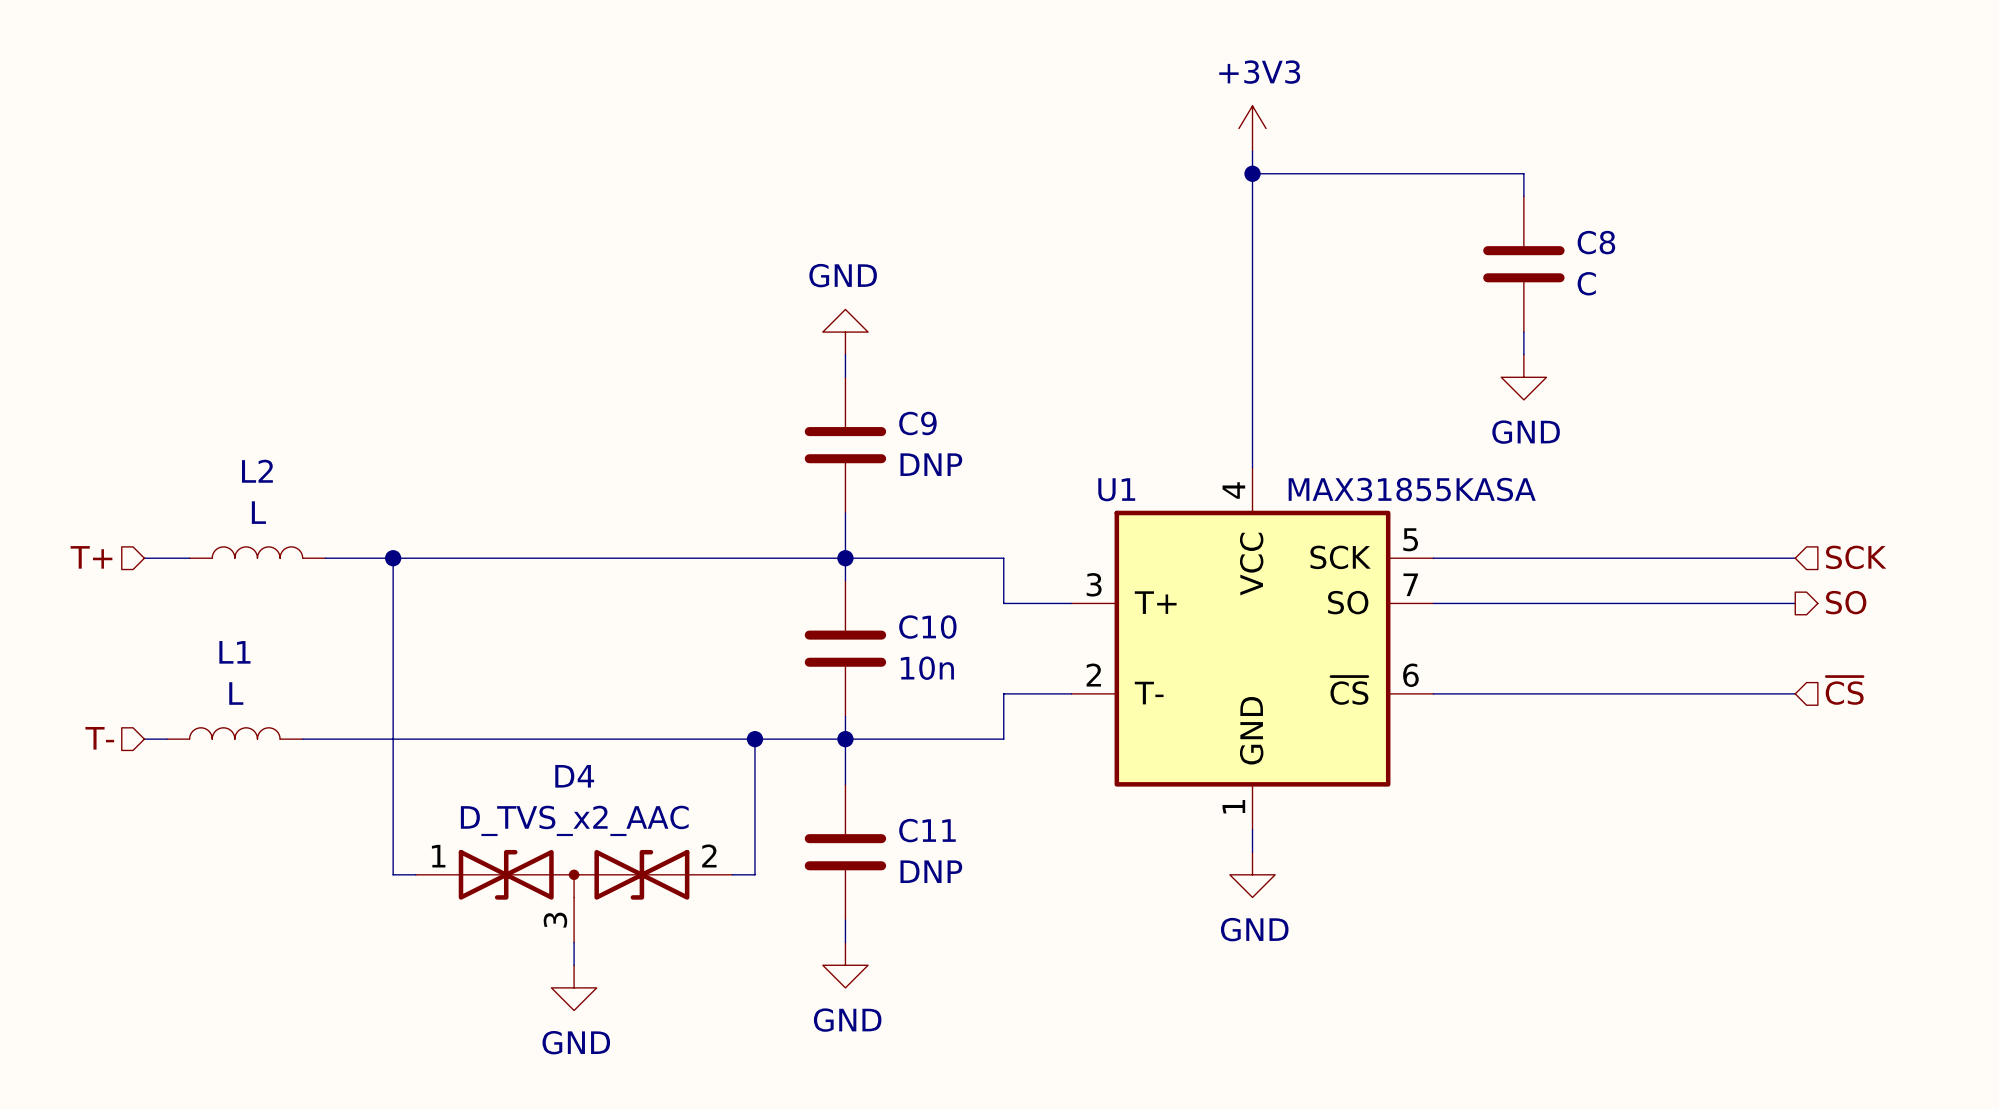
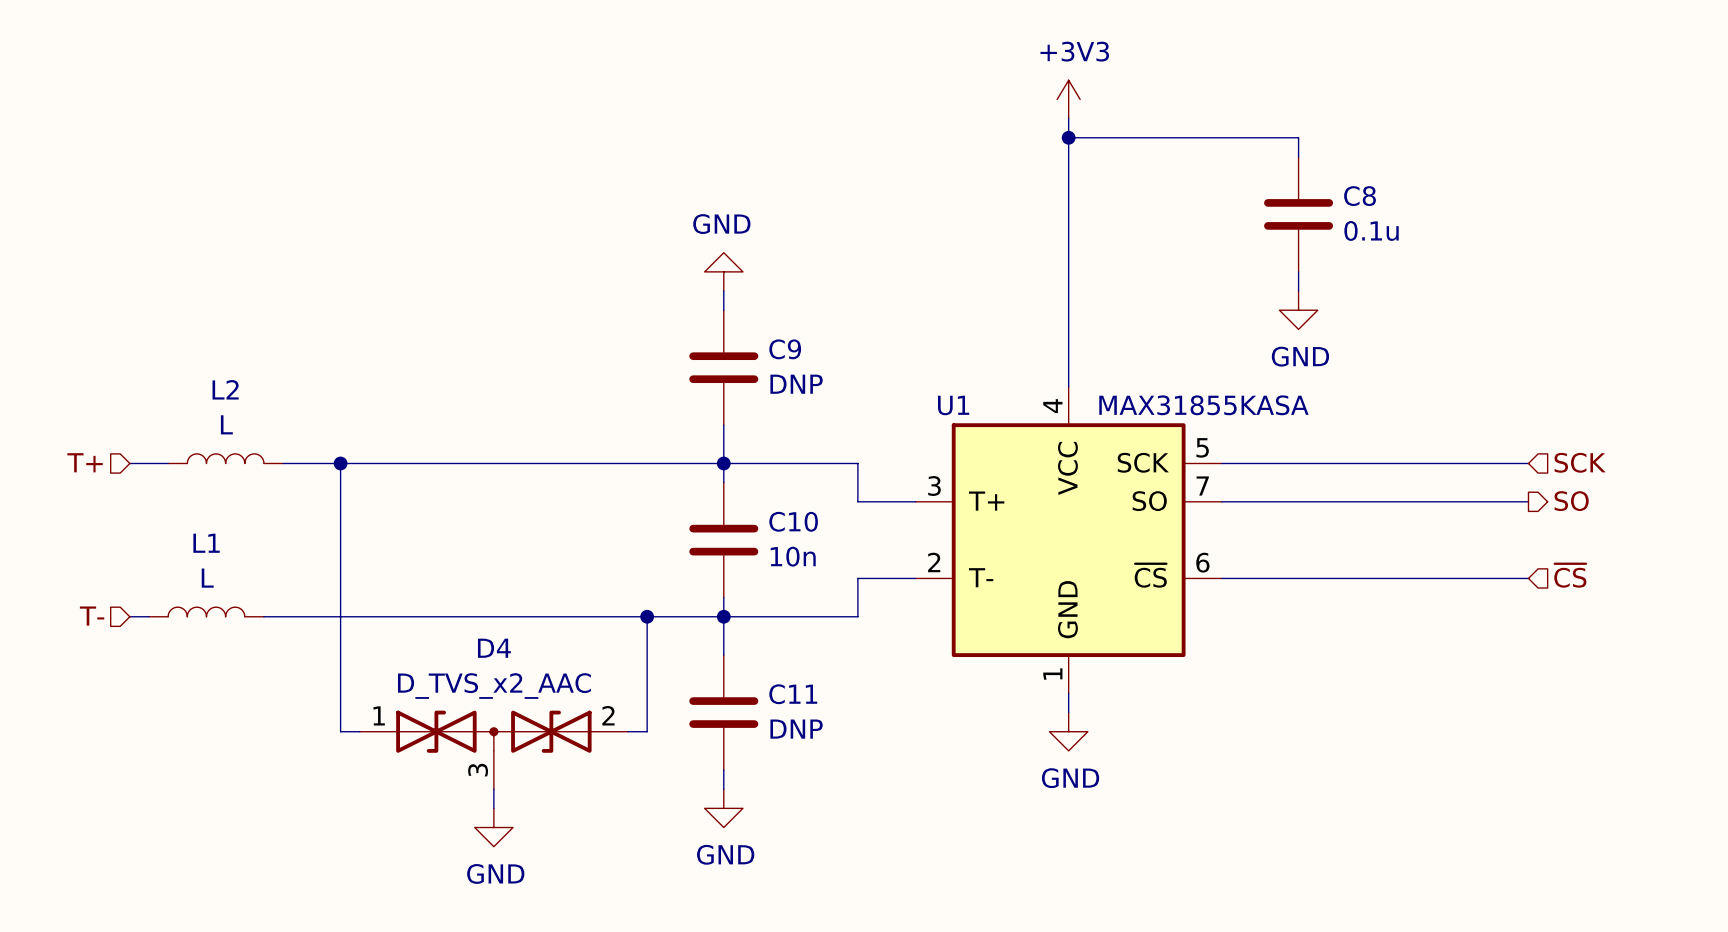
C8 value: C (1586, 283) -> 0.1u (1371, 230)

